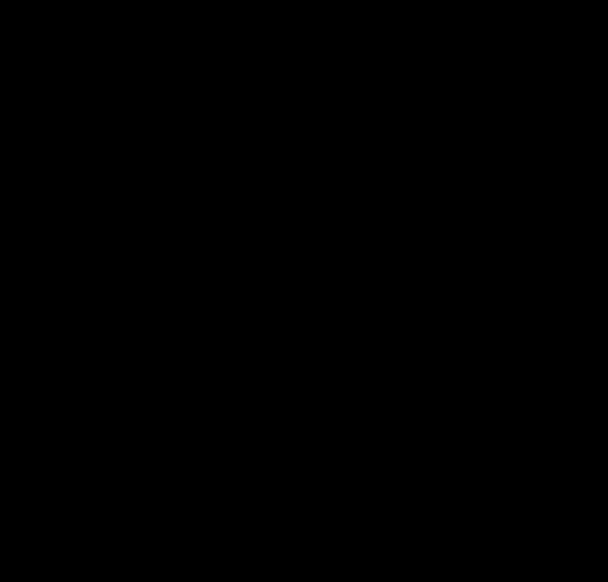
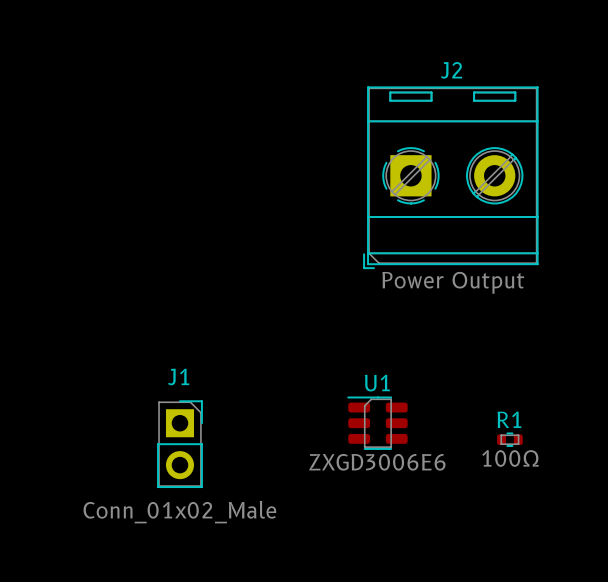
J2: none -> Power Output (450, 177)
U1: none -> ZXGD3006E6 (377, 423)
R1: none -> 100Ω (509, 439)
J1: none -> Conn_01x02_Male (179, 444)

